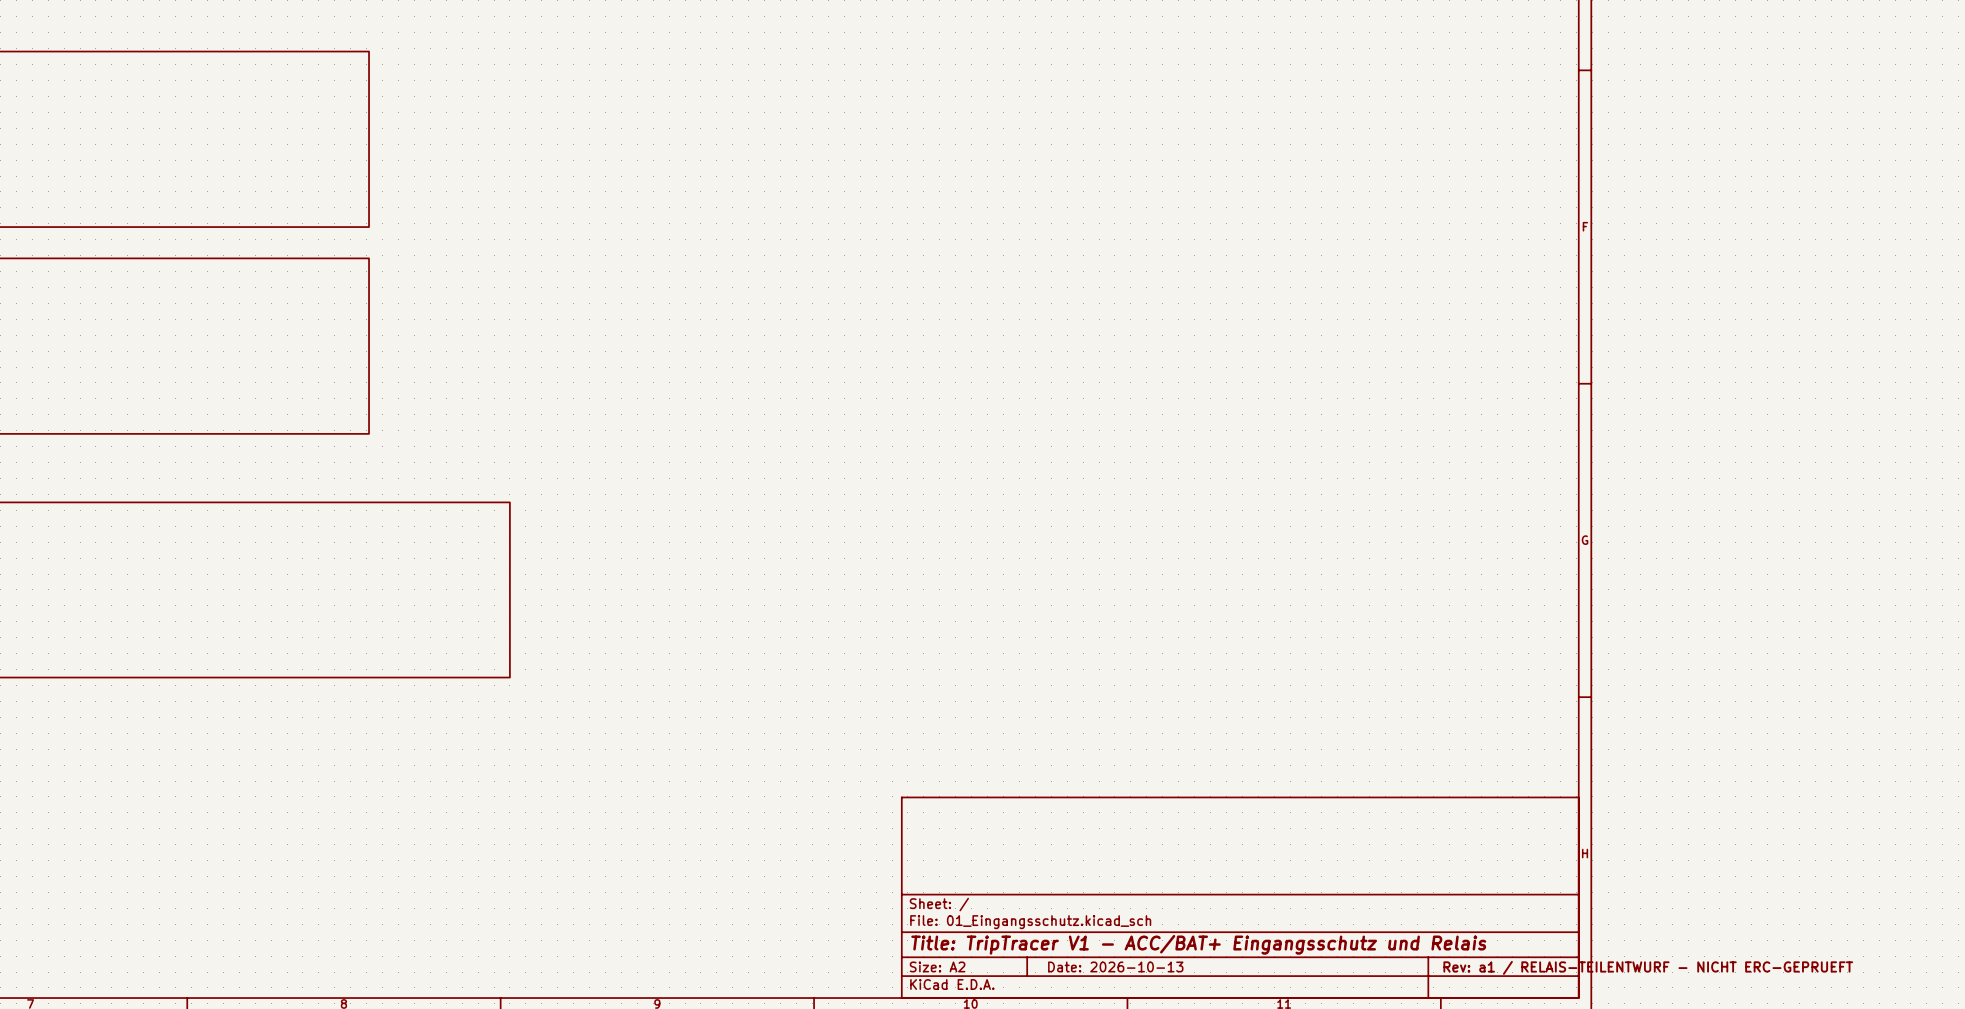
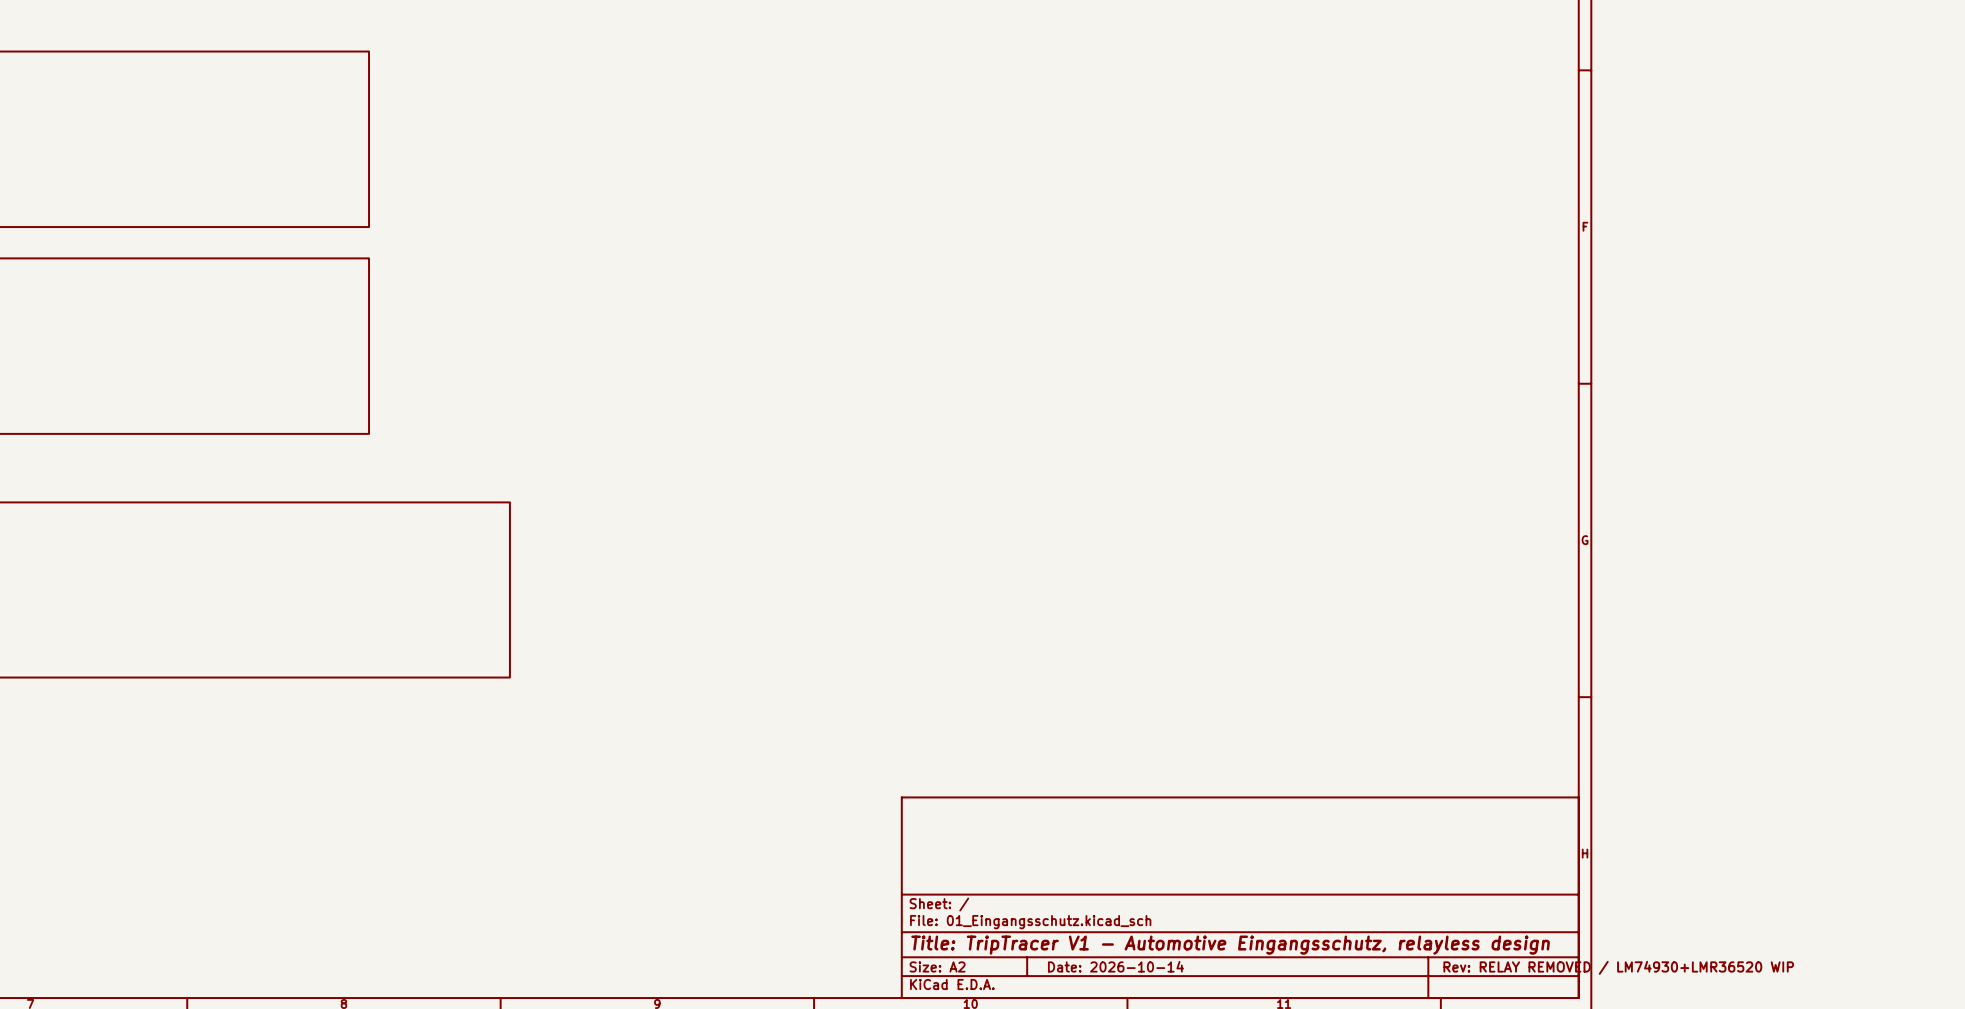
title block: Title: TripTracer V1 - ACC/BAT+ Eingangsschutz und Relais (1198, 944) -> Title: TripTracer V1 - Automotive Eingangsschutz, relayless design (1230, 945)
title block: Date: 2026-10-13 (1115, 966) -> Date: 2026-10-14 (1116, 966)
title block: Rev: a1 / RELAIS-TEILENTWURF - NICHT ERC-GEPRUEFT (1648, 967) -> Rev: RELAY REMOVED / LM74930+LMR36520 WIP (1618, 967)

